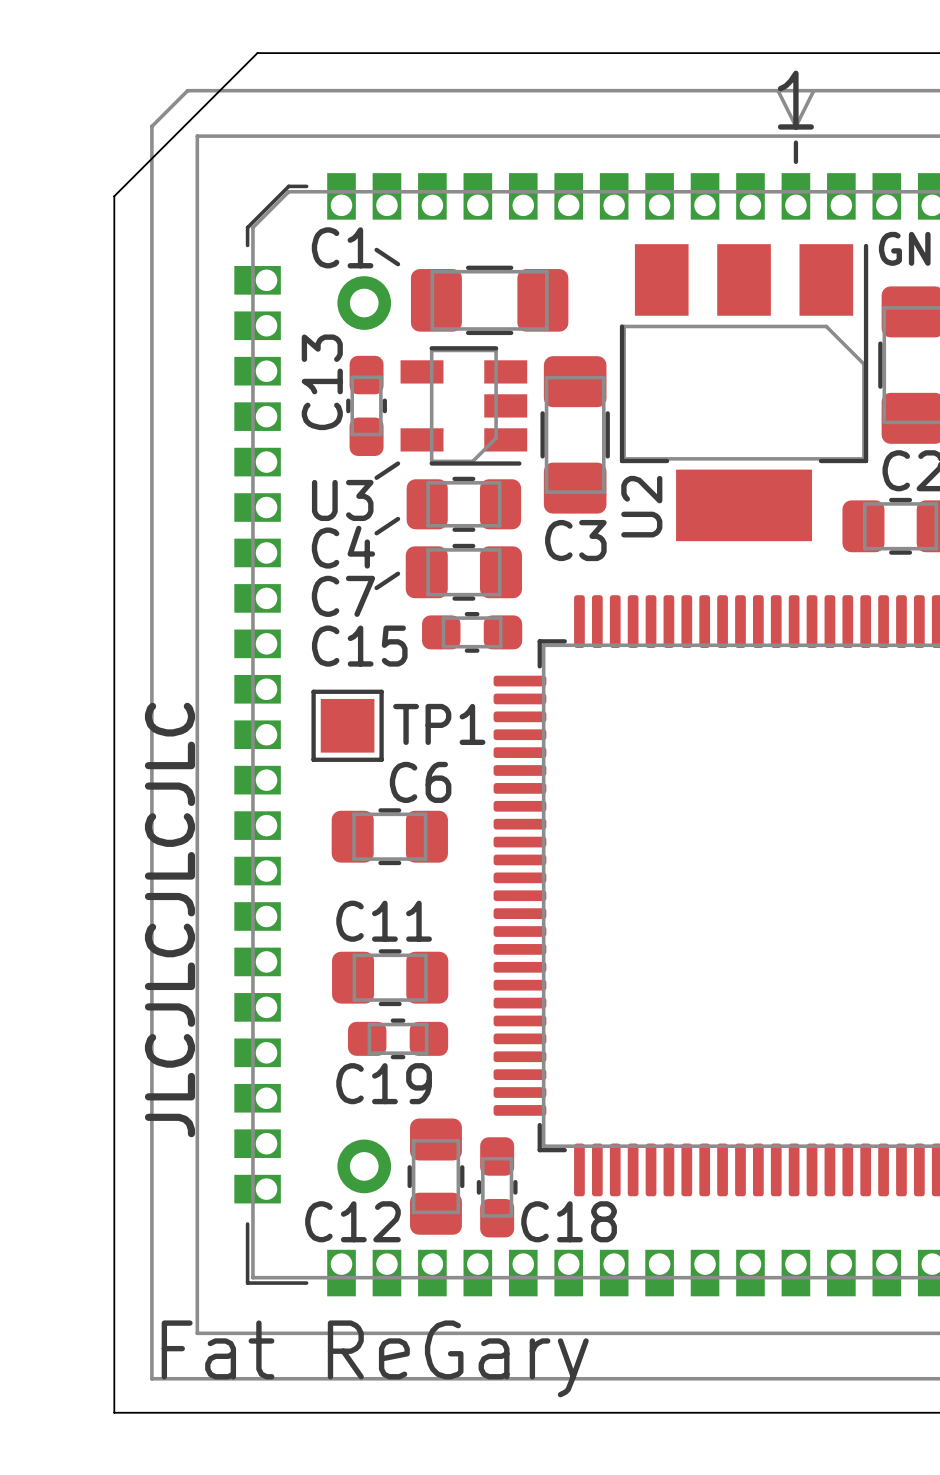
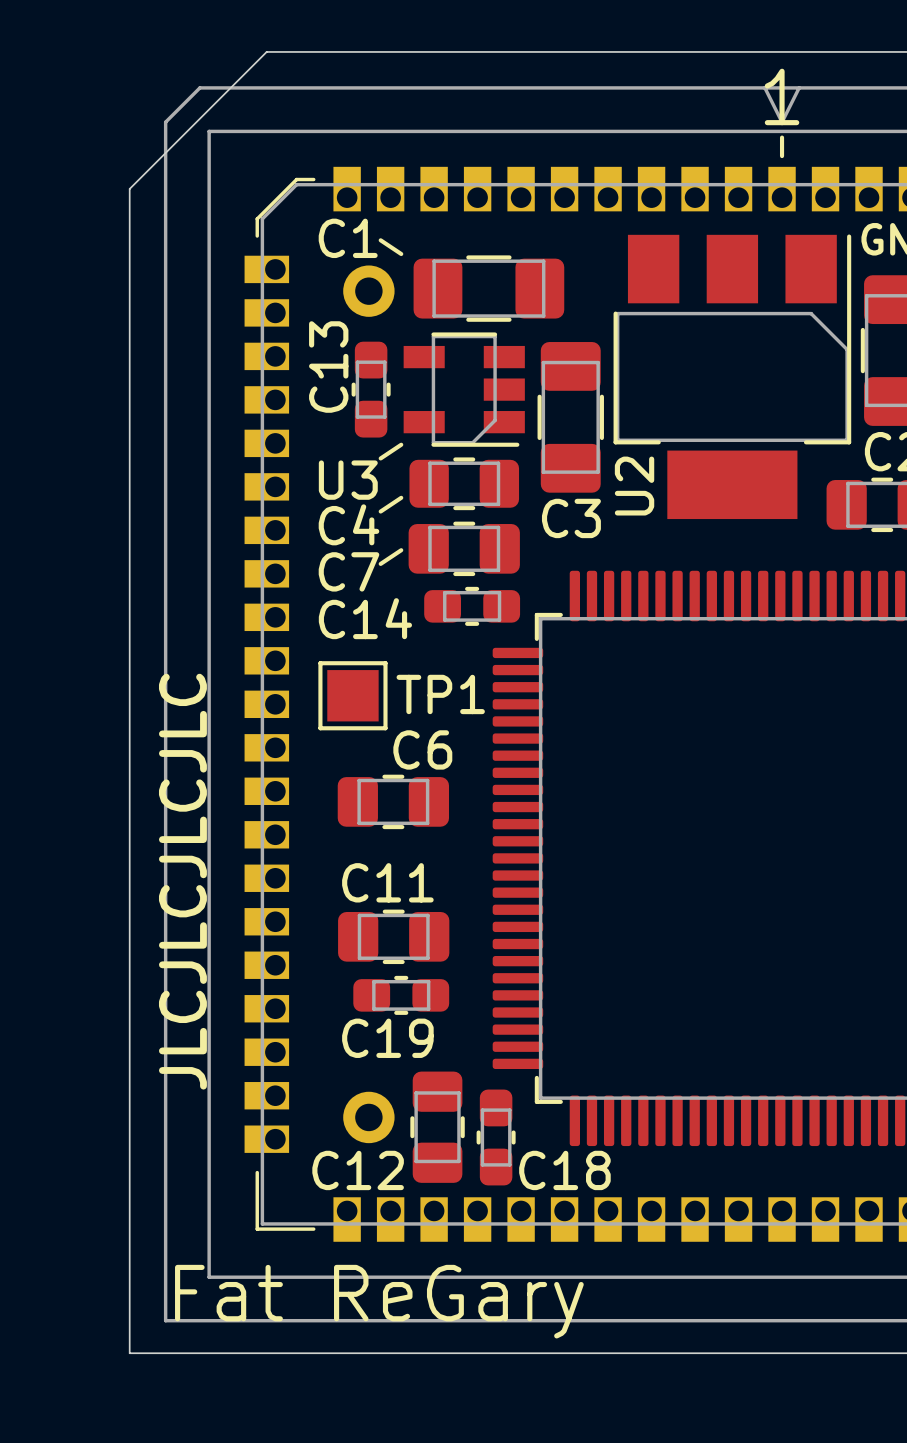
C15 name: C15 (359, 646) -> C14 (365, 618)

